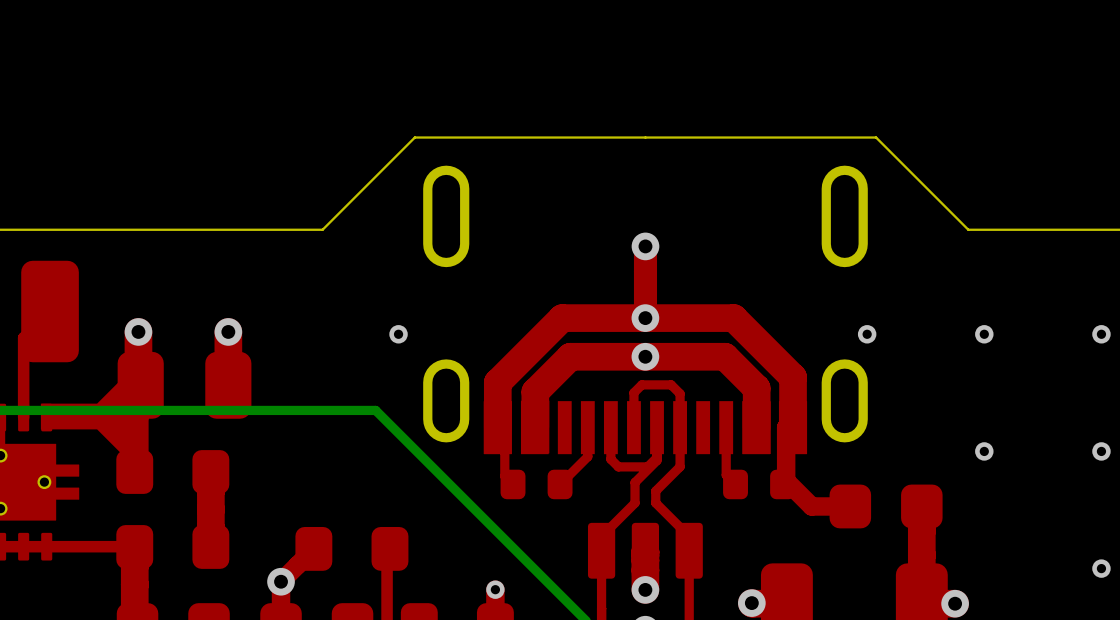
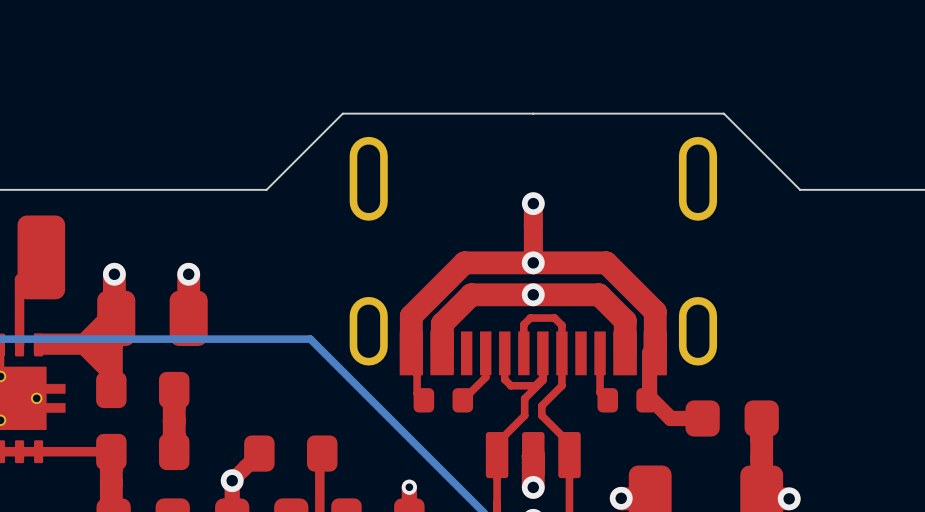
via: (398, 334) -> none
via: (867, 334) -> none
via: (984, 334) -> none
via: (1101, 334) -> none
via: (984, 451) -> none
via: (1101, 451) -> none
via: (1101, 568) -> none

